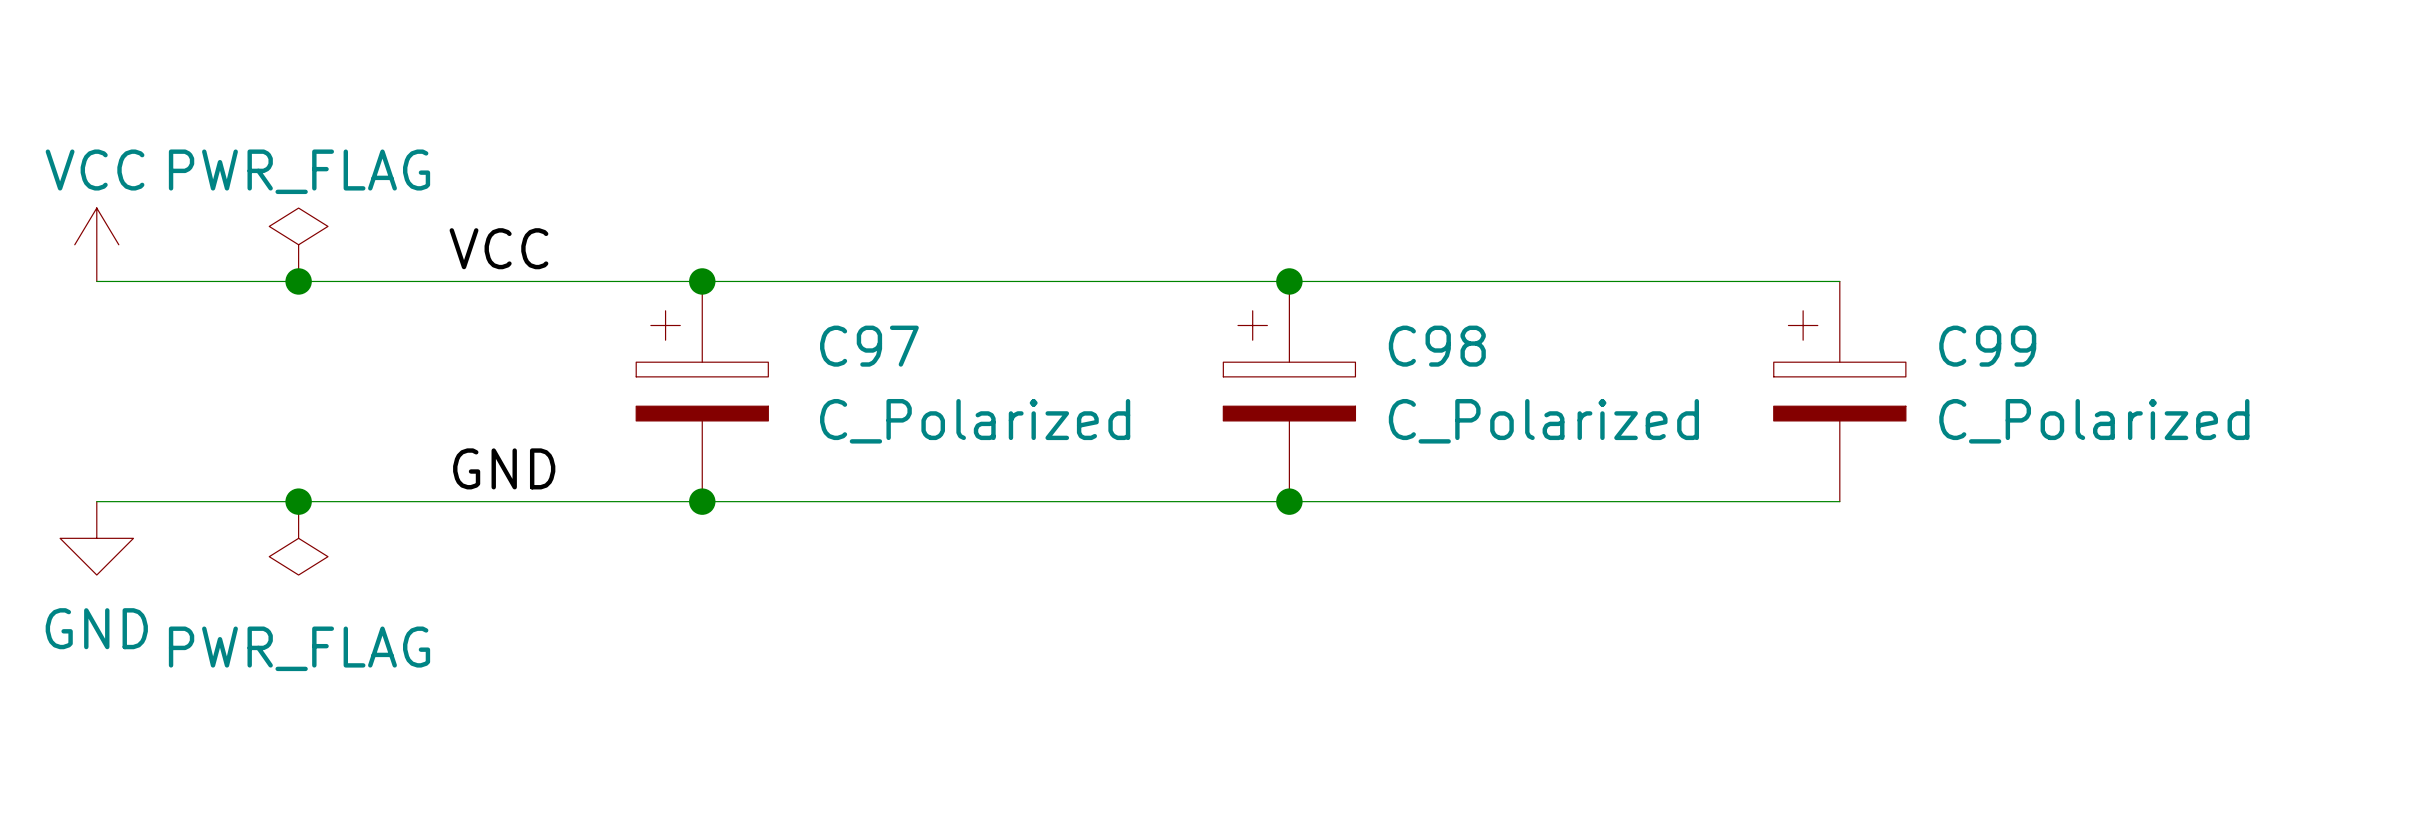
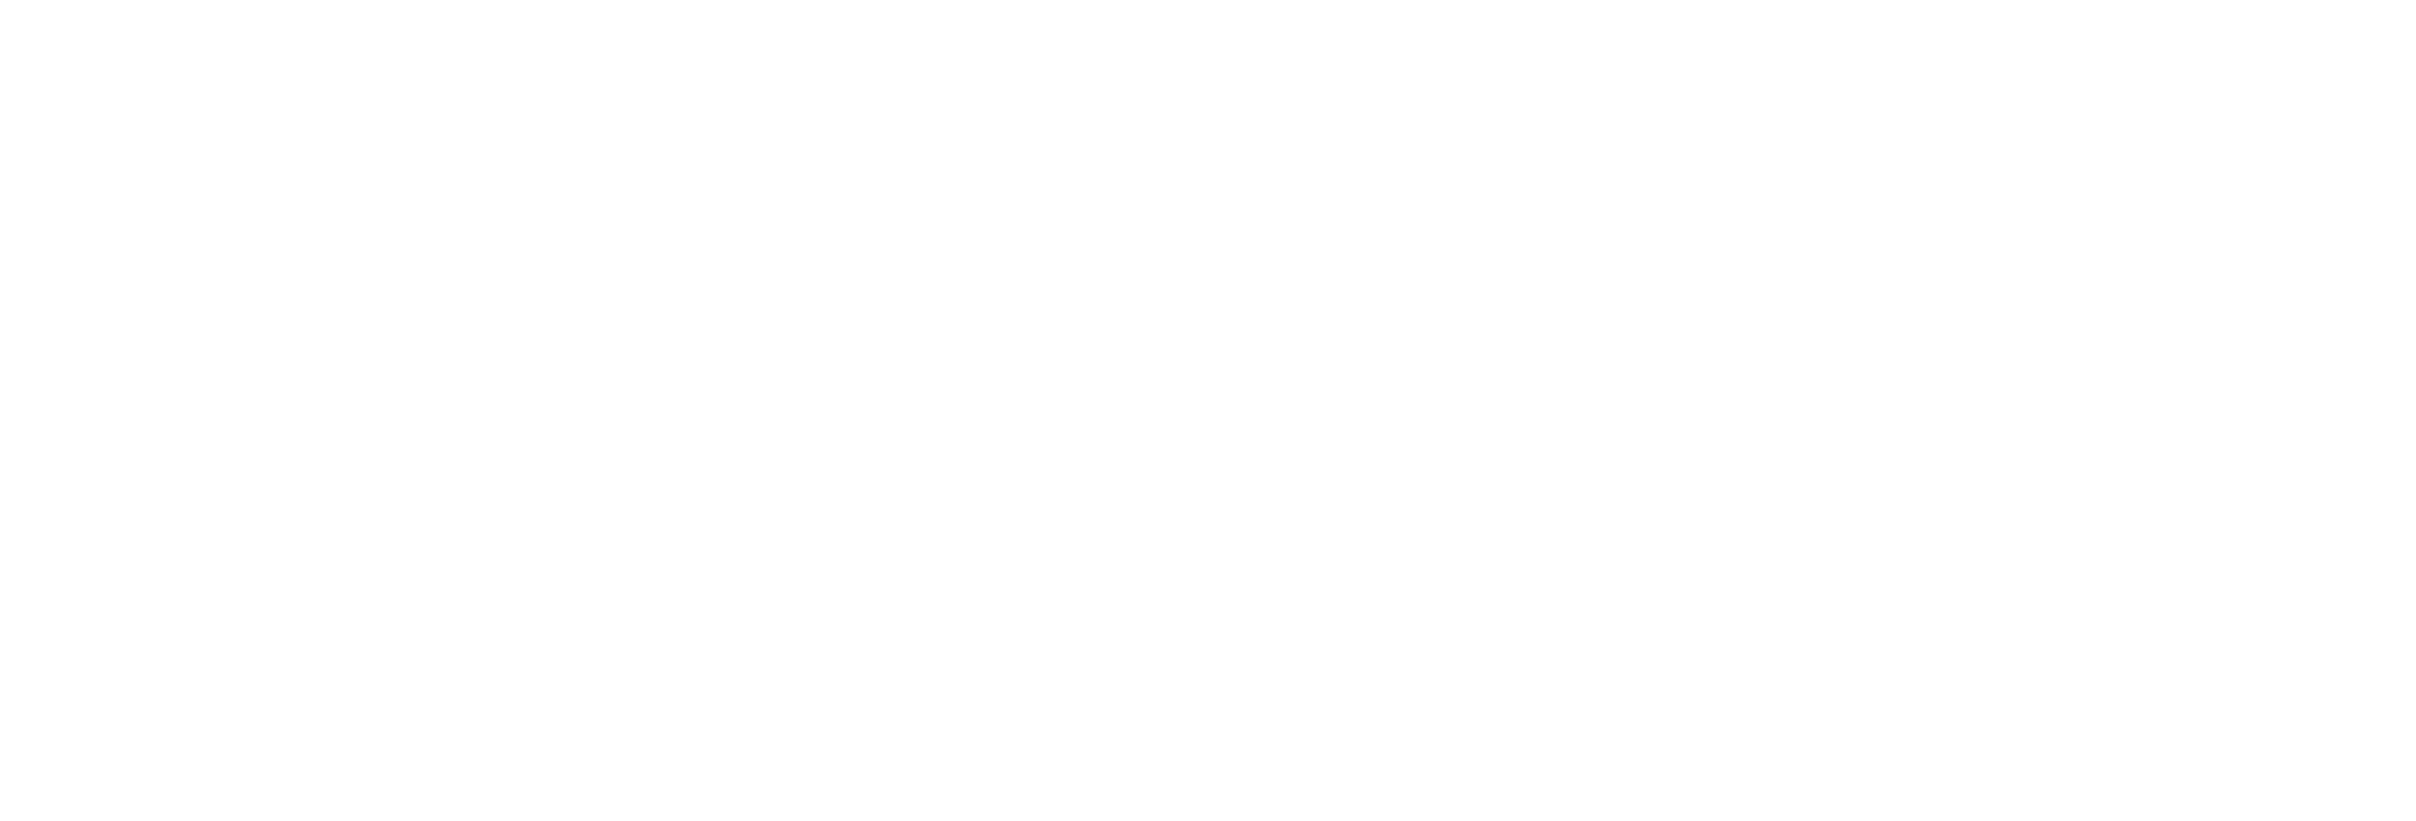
power symbol: VCC (96, 244) -> none
power symbol: PWR_FLAG (298, 244) -> none
label: VCC (498, 248) -> none
wire: (96, 281) (1839, 281) -> none
junction: (298, 281) -> none
junction: (702, 281) -> none
junction: (1289, 281) -> none
C97: C_Polarized (702, 391) -> none
C98: C_Polarized (1289, 391) -> none
C99: C_Polarized (1839, 391) -> none
label: GND (504, 468) -> none
wire: (96, 501) (1839, 501) -> none
junction: (298, 501) -> none
junction: (702, 501) -> none
junction: (1289, 501) -> none
power symbol: GND (96, 538) -> none
power symbol: PWR_FLAG (298, 538) -> none

